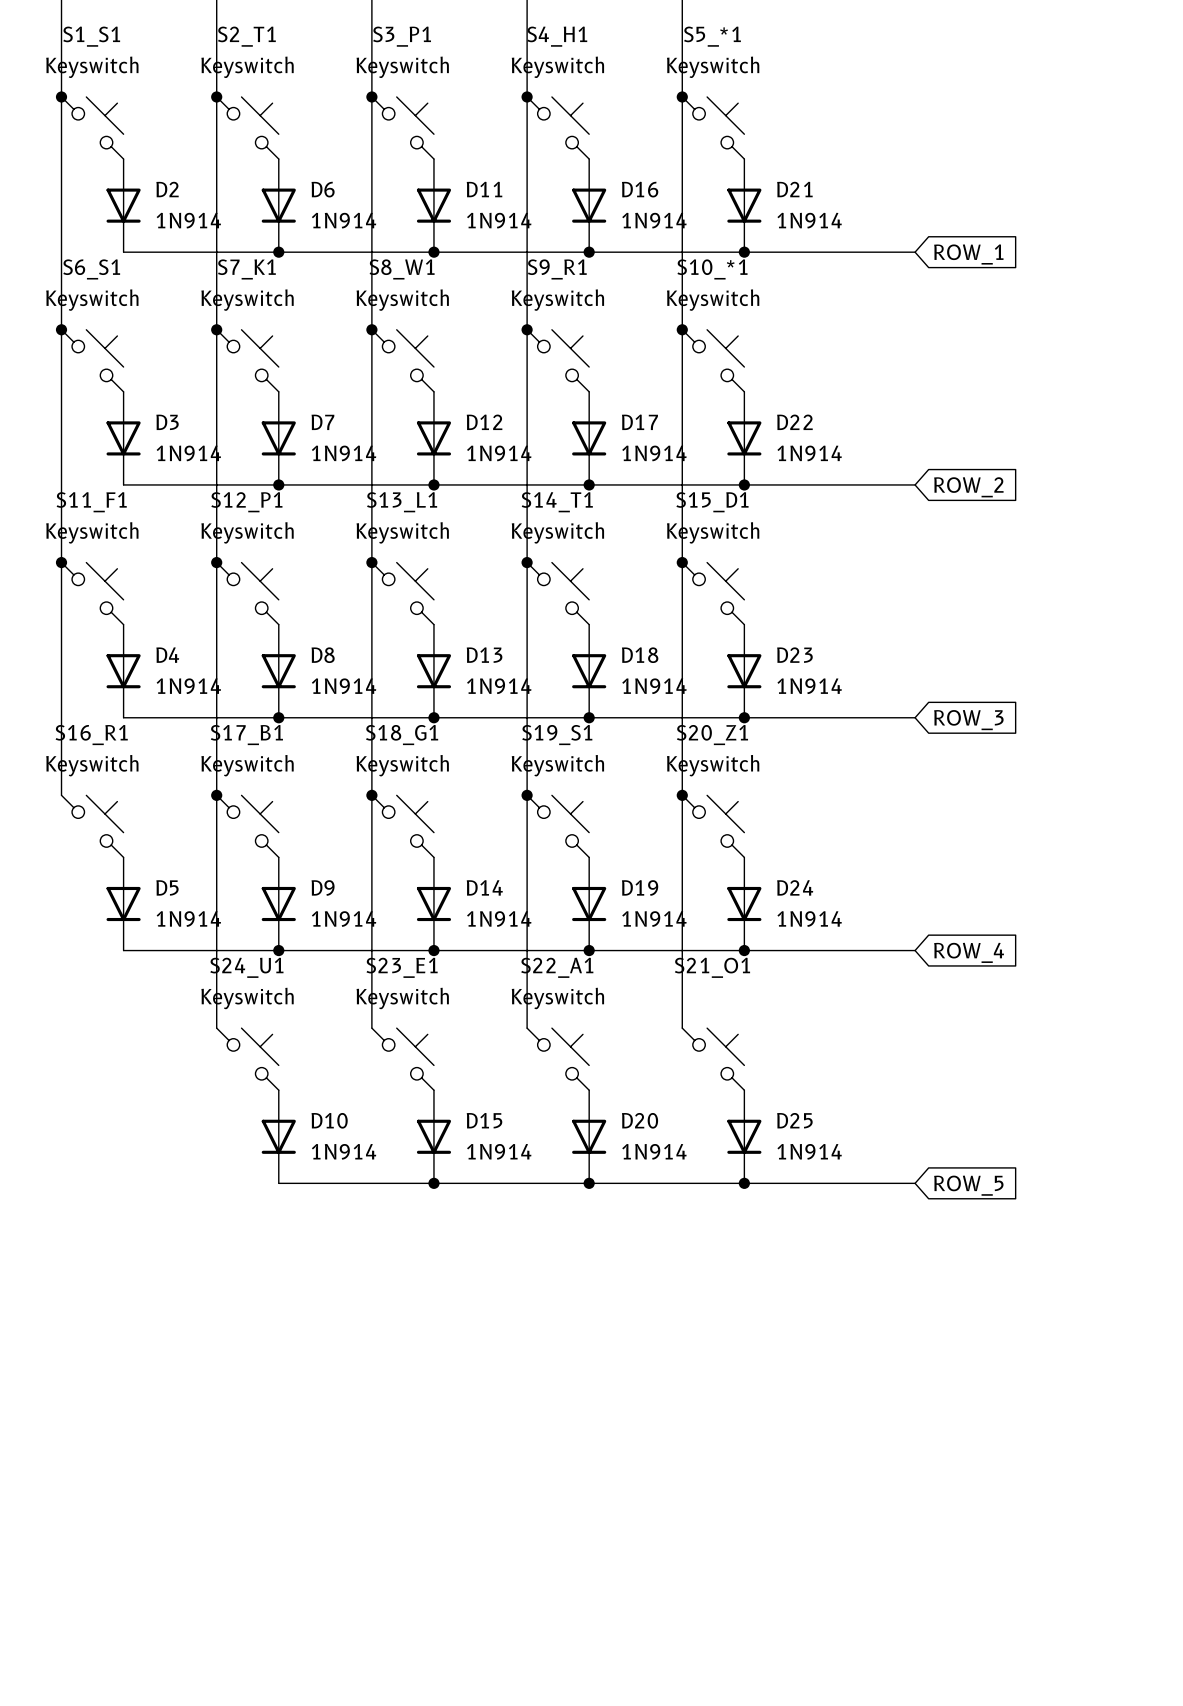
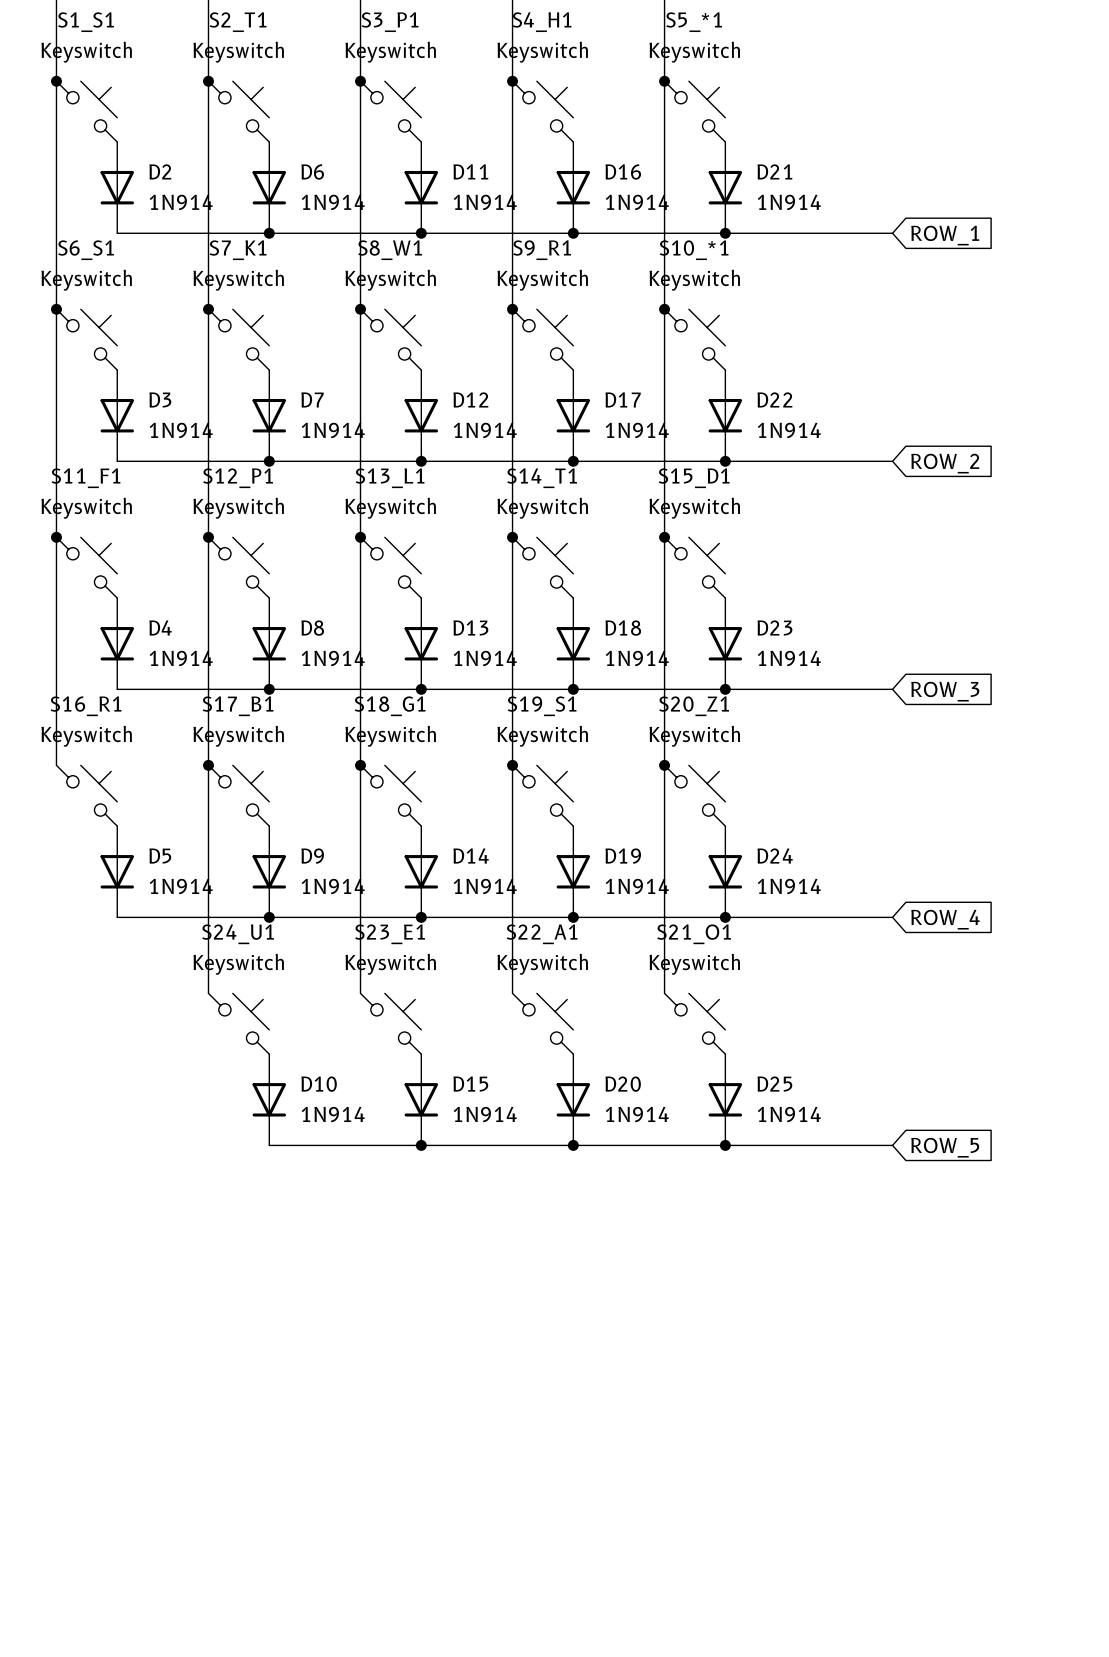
S21_O1 value: none -> Keyswitch (694, 964)

